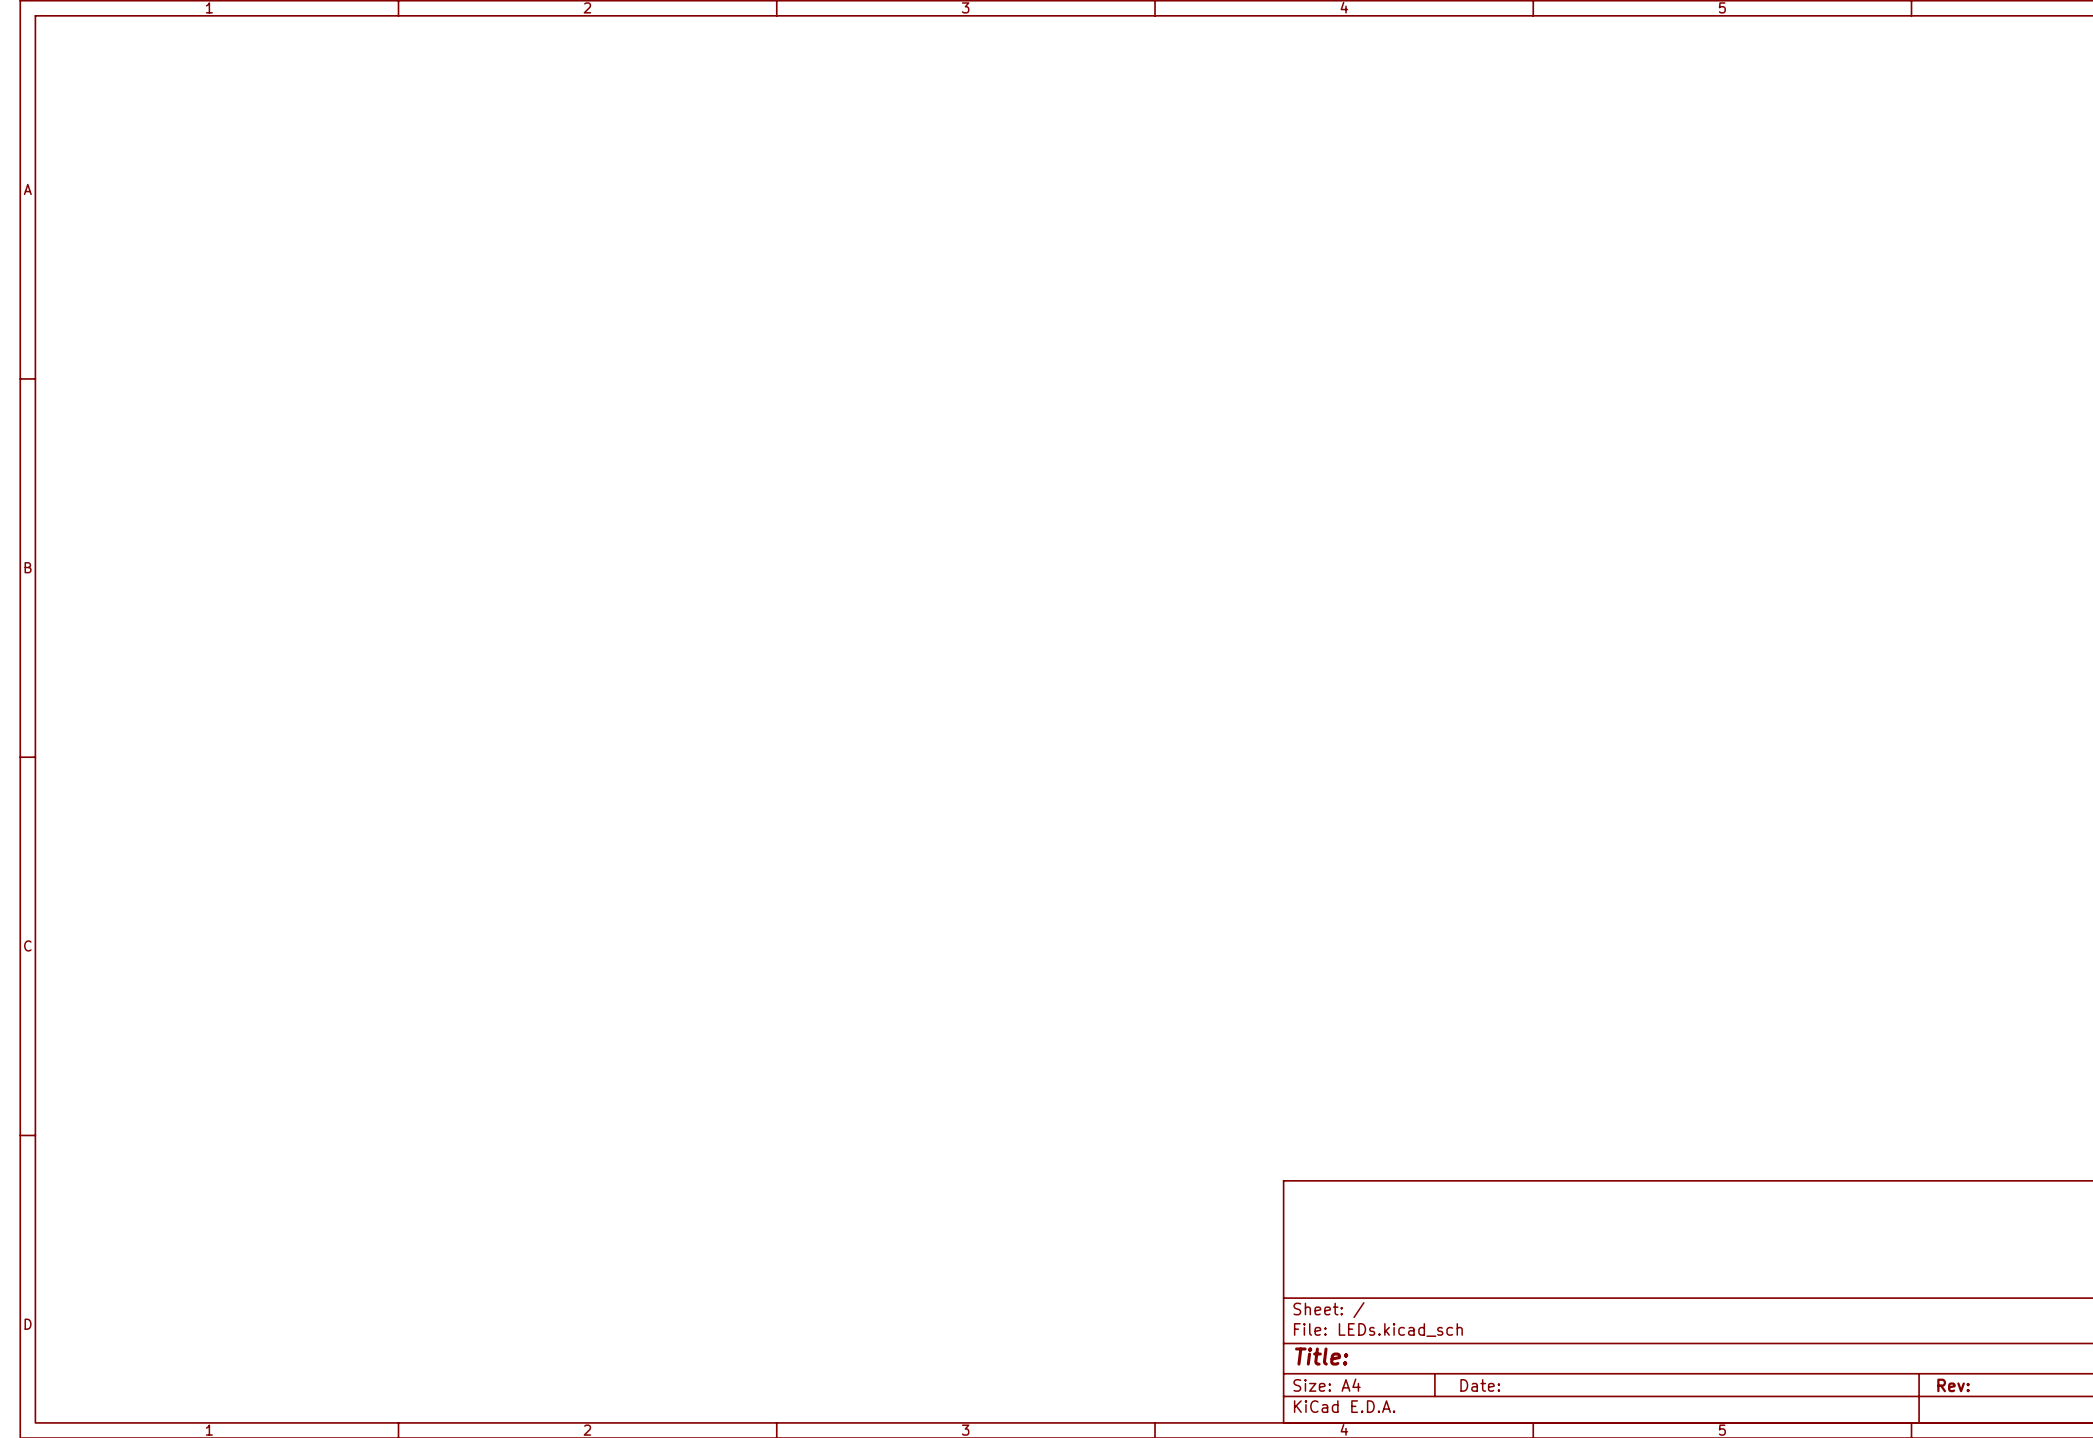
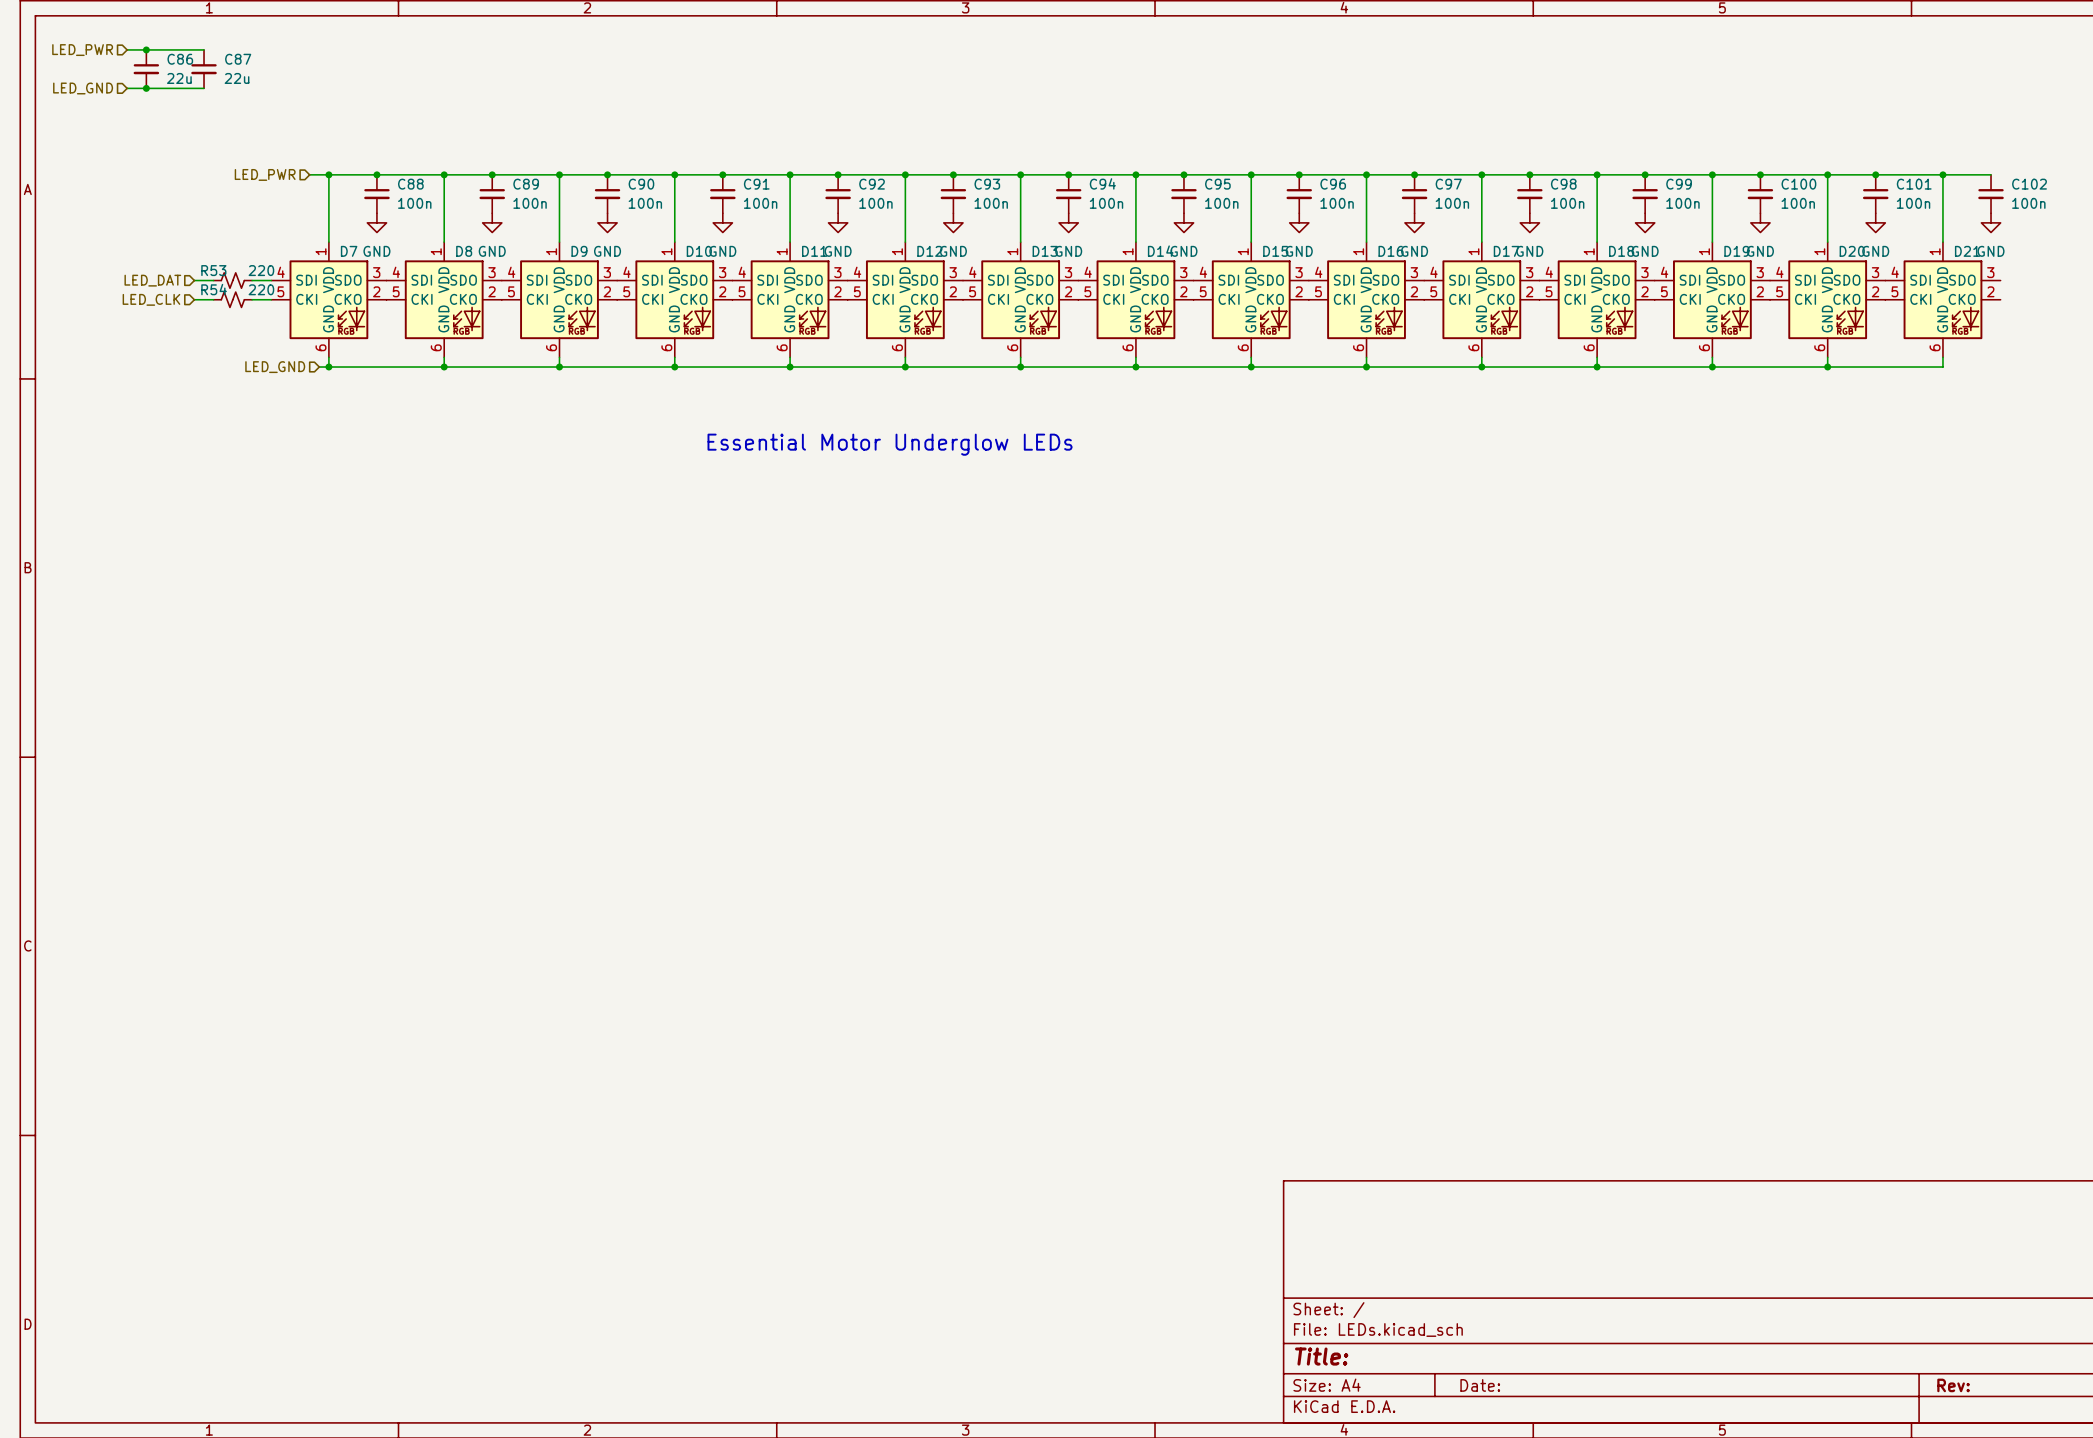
wire: none -> (127, 49) (204, 49)
junction: none -> (146, 49)
hierarchical label: none -> LED_PWR (82, 50)
C86: none -> 22u (146, 69)
C87: none -> 22u (204, 69)
hierarchical label: none -> LED_GND (83, 88)
wire: none -> (127, 88) (204, 88)
junction: none -> (146, 88)
hierarchical label: none -> LED_PWR (265, 174)
wire: none -> (309, 174) (1991, 174)
wire: none -> (328, 174) (328, 242)
junction: none -> (328, 174)
junction: none -> (376, 174)
wire: none -> (444, 174) (444, 242)
junction: none -> (444, 174)
junction: none -> (492, 174)
wire: none -> (559, 174) (559, 242)
junction: none -> (559, 174)
junction: none -> (607, 174)
wire: none -> (674, 174) (674, 242)
junction: none -> (674, 174)
junction: none -> (722, 174)
wire: none -> (790, 174) (790, 242)
junction: none -> (790, 174)
junction: none -> (838, 174)
wire: none -> (905, 174) (905, 242)
junction: none -> (905, 174)
junction: none -> (953, 174)
wire: none -> (1020, 174) (1020, 242)
junction: none -> (1020, 174)
junction: none -> (1068, 174)
wire: none -> (1135, 174) (1135, 242)
junction: none -> (1135, 174)
junction: none -> (1183, 174)
wire: none -> (1251, 174) (1251, 242)
junction: none -> (1251, 174)
junction: none -> (1299, 174)
wire: none -> (1366, 174) (1366, 242)
junction: none -> (1366, 174)
junction: none -> (1414, 174)
wire: none -> (1481, 174) (1481, 242)
junction: none -> (1481, 174)
junction: none -> (1529, 174)
wire: none -> (1597, 174) (1597, 242)
junction: none -> (1597, 174)
junction: none -> (1645, 174)
wire: none -> (1712, 174) (1712, 242)
junction: none -> (1712, 174)
junction: none -> (1760, 174)
wire: none -> (1827, 174) (1827, 242)
junction: none -> (1827, 174)
junction: none -> (1875, 174)
wire: none -> (1942, 174) (1942, 242)
junction: none -> (1942, 174)
C88: none -> 100n (376, 194)
C89: none -> 100n (492, 194)
C90: none -> 100n (607, 194)
C91: none -> 100n (722, 194)
C92: none -> 100n (838, 194)
C93: none -> 100n (953, 194)
C94: none -> 100n (1068, 194)
C95: none -> 100n (1183, 194)
C96: none -> 100n (1299, 194)
C97: none -> 100n (1414, 194)
C98: none -> 100n (1529, 194)
C99: none -> 100n (1645, 194)
C100: none -> 100n (1760, 194)
C101: none -> 100n (1875, 194)
C102: none -> 100n (1991, 194)
power symbol: none -> GND (376, 222)
power symbol: none -> GND (492, 222)
power symbol: none -> GND (607, 222)
power symbol: none -> GND (722, 222)
power symbol: none -> GND (838, 222)
power symbol: none -> GND (953, 222)
power symbol: none -> GND (1068, 222)
power symbol: none -> GND (1183, 222)
power symbol: none -> GND (1299, 222)
power symbol: none -> GND (1414, 222)
power symbol: none -> GND (1529, 222)
power symbol: none -> GND (1645, 222)
power symbol: none -> GND (1760, 222)
power symbol: none -> GND (1875, 222)
power symbol: none -> GND (1991, 222)
hierarchical label: none -> LED_DAT (152, 280)
wire: none -> (194, 280) (213, 280)
R53: none -> 220 (232, 280)
wire: none -> (252, 280) (271, 280)
hierarchical label: none -> LED_CLK (151, 299)
wire: none -> (194, 299) (213, 299)
R54: none -> 220 (232, 299)
wire: none -> (252, 299) (271, 299)
D7: none -> (328, 299)
D8: none -> (444, 299)
D9: none -> (559, 299)
D10: none -> (674, 299)
D11: none -> (790, 299)
D12: none -> (905, 299)
D13: none -> (1020, 299)
D14: none -> (1135, 299)
D15: none -> (1251, 299)
D16: none -> (1366, 299)
D17: none -> (1481, 299)
D18: none -> (1597, 299)
D19: none -> (1712, 299)
D20: none -> (1827, 299)
D21: none -> (1942, 299)
wire: none -> (328, 357) (328, 367)
wire: none -> (444, 357) (444, 367)
wire: none -> (559, 357) (559, 367)
wire: none -> (674, 357) (674, 367)
wire: none -> (790, 357) (790, 367)
wire: none -> (905, 357) (905, 367)
wire: none -> (1020, 357) (1020, 367)
wire: none -> (1135, 357) (1135, 367)
wire: none -> (1251, 357) (1251, 367)
wire: none -> (1366, 357) (1366, 367)
wire: none -> (1481, 357) (1481, 367)
wire: none -> (1597, 357) (1597, 367)
wire: none -> (1712, 357) (1712, 367)
wire: none -> (1827, 357) (1827, 367)
wire: none -> (1942, 357) (1942, 367) (319, 367)
hierarchical label: none -> LED_GND (275, 367)
junction: none -> (328, 367)
junction: none -> (444, 367)
junction: none -> (559, 367)
junction: none -> (674, 367)
junction: none -> (790, 367)
junction: none -> (905, 367)
junction: none -> (1020, 367)
junction: none -> (1135, 367)
junction: none -> (1251, 367)
junction: none -> (1366, 367)
junction: none -> (1481, 367)
junction: none -> (1597, 367)
junction: none -> (1712, 367)
junction: none -> (1827, 367)
text: none -> Essential Motor Underglow LEDs (890, 444)

